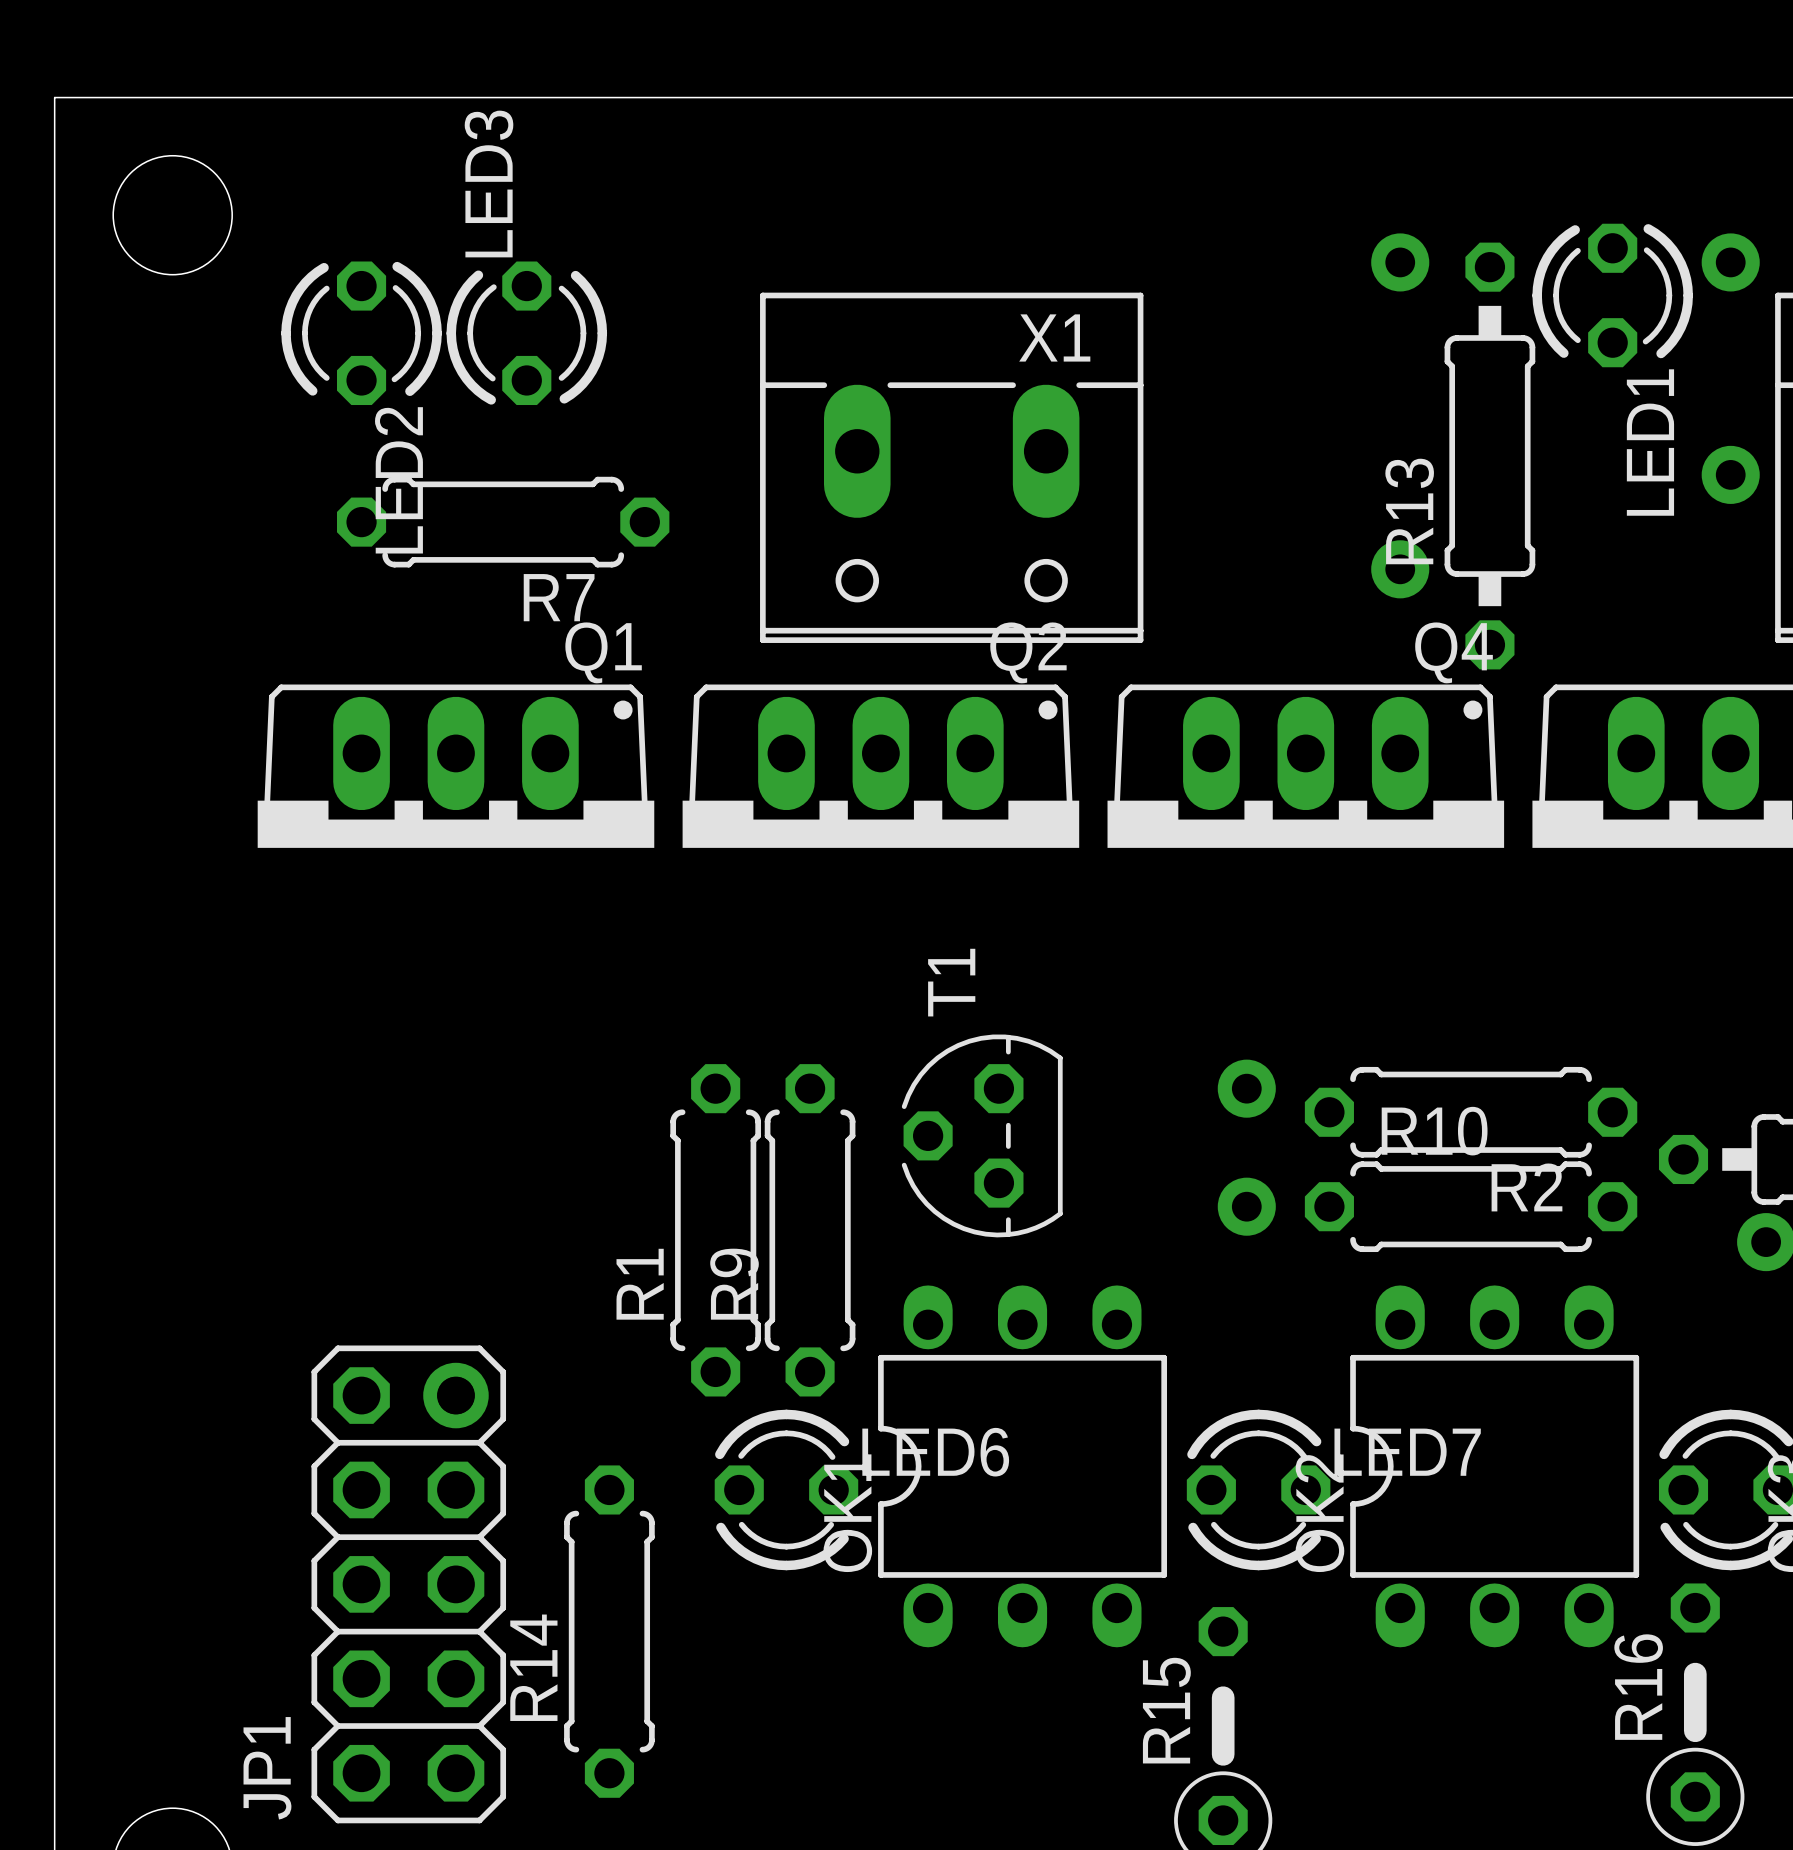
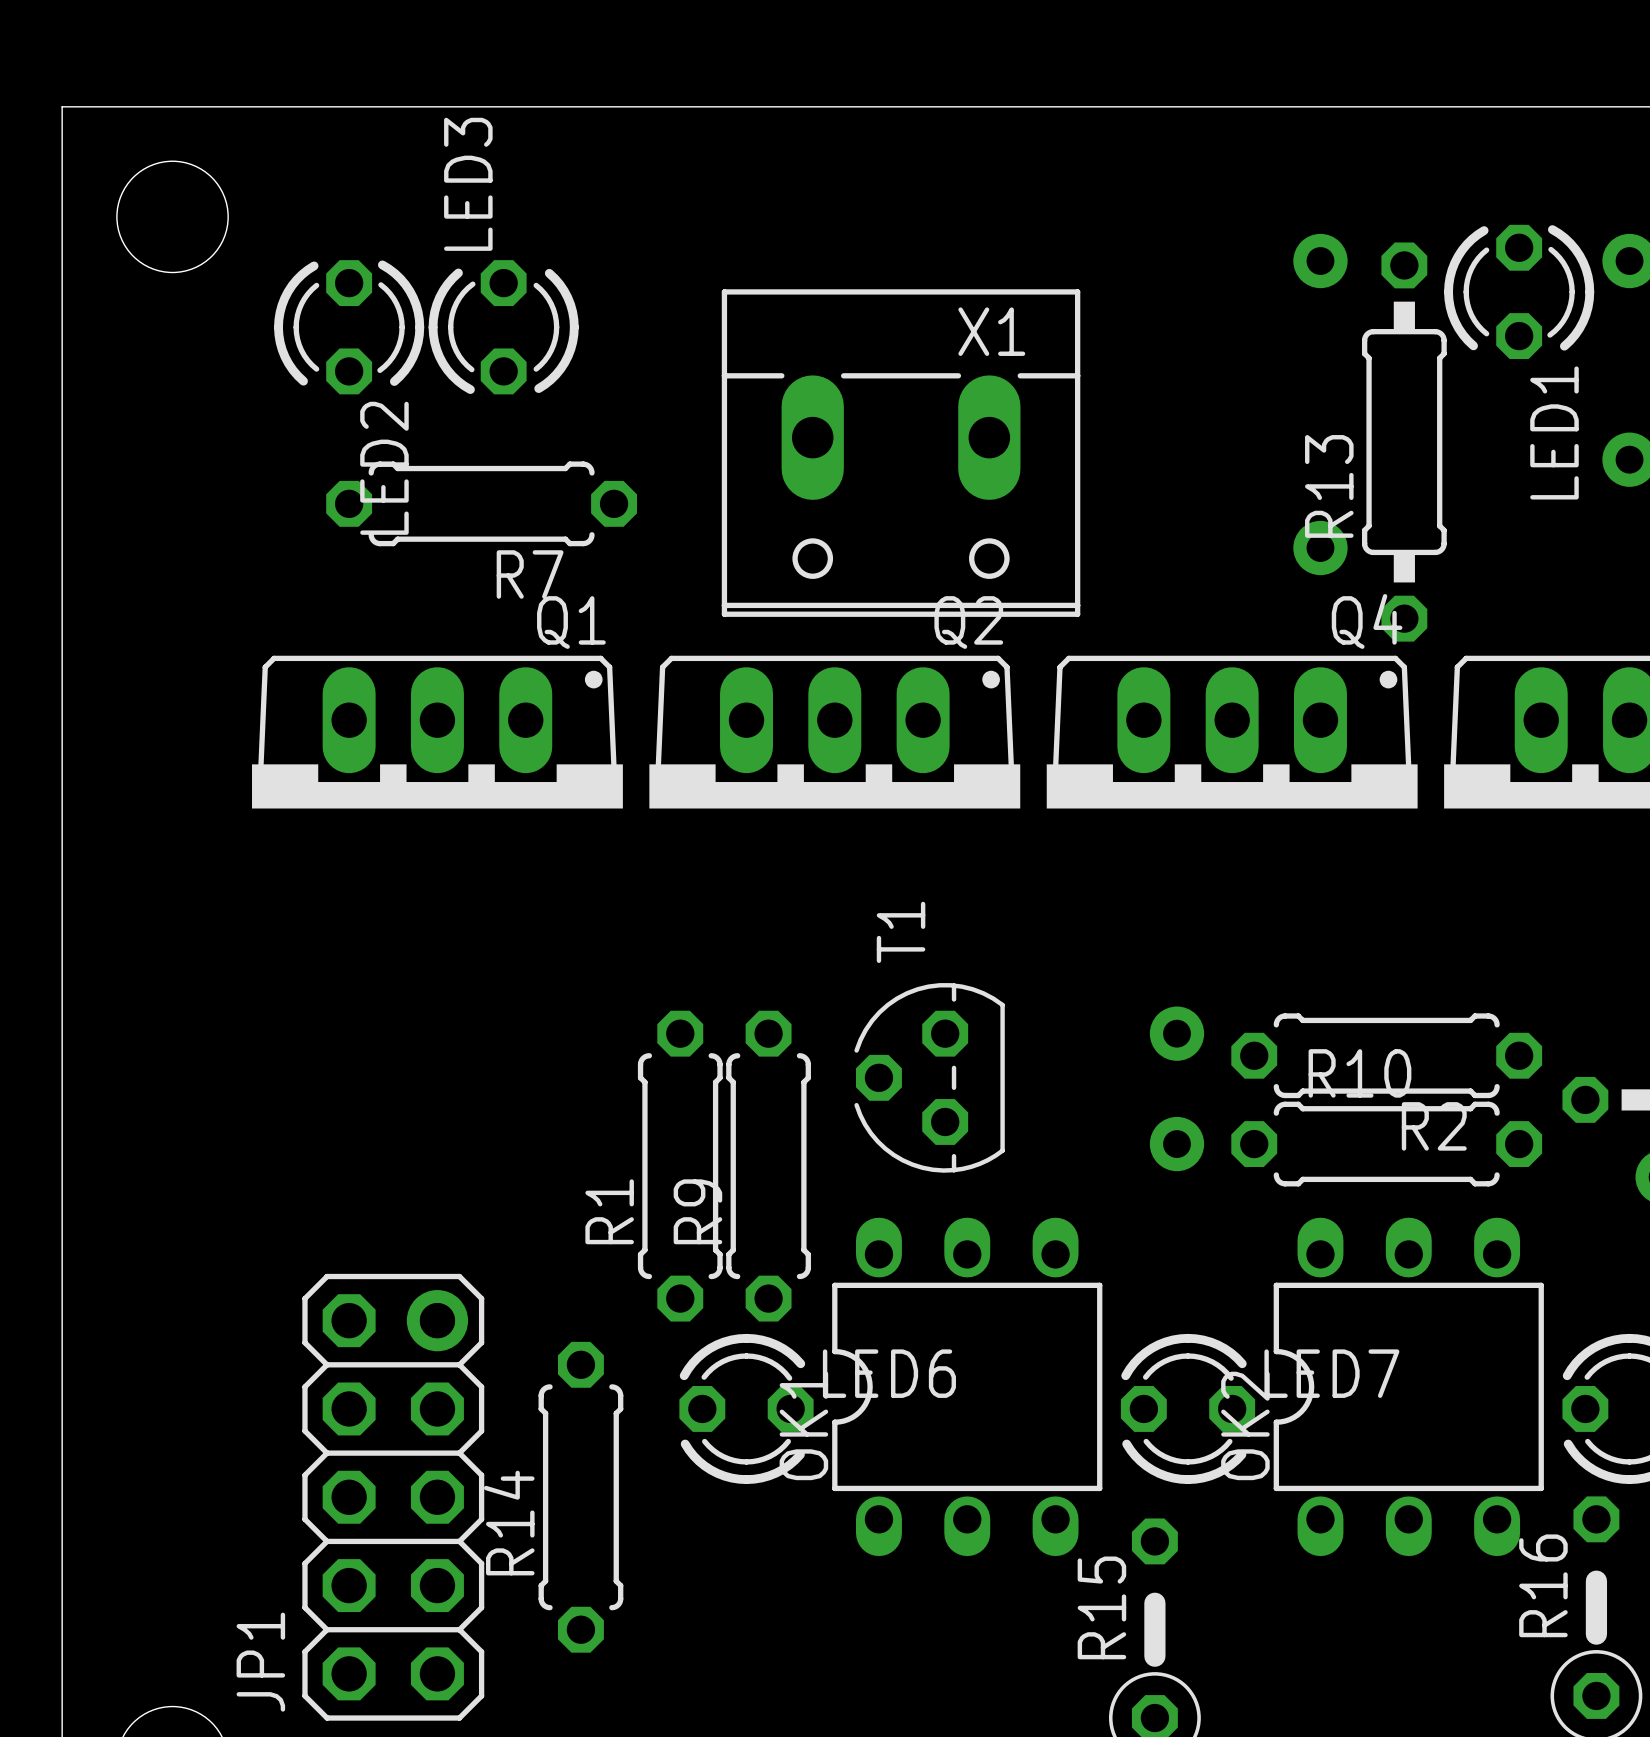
R14 position: (609, 1631) -> (580, 1497)

